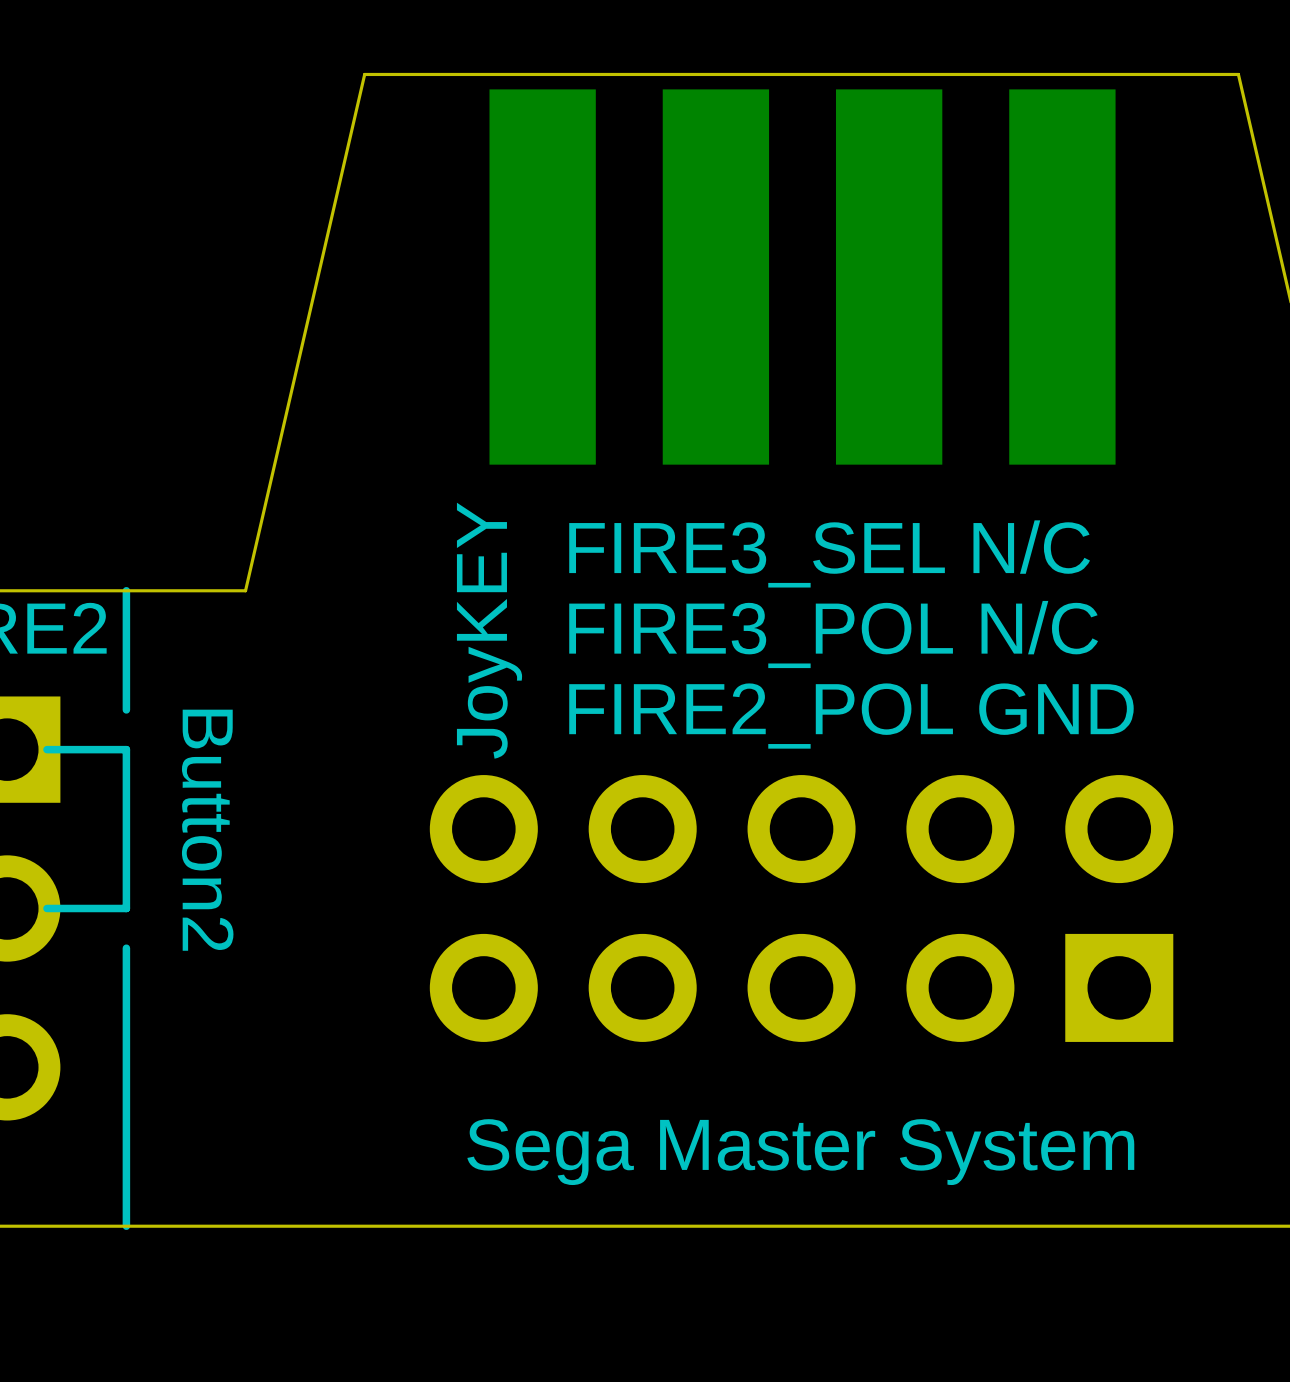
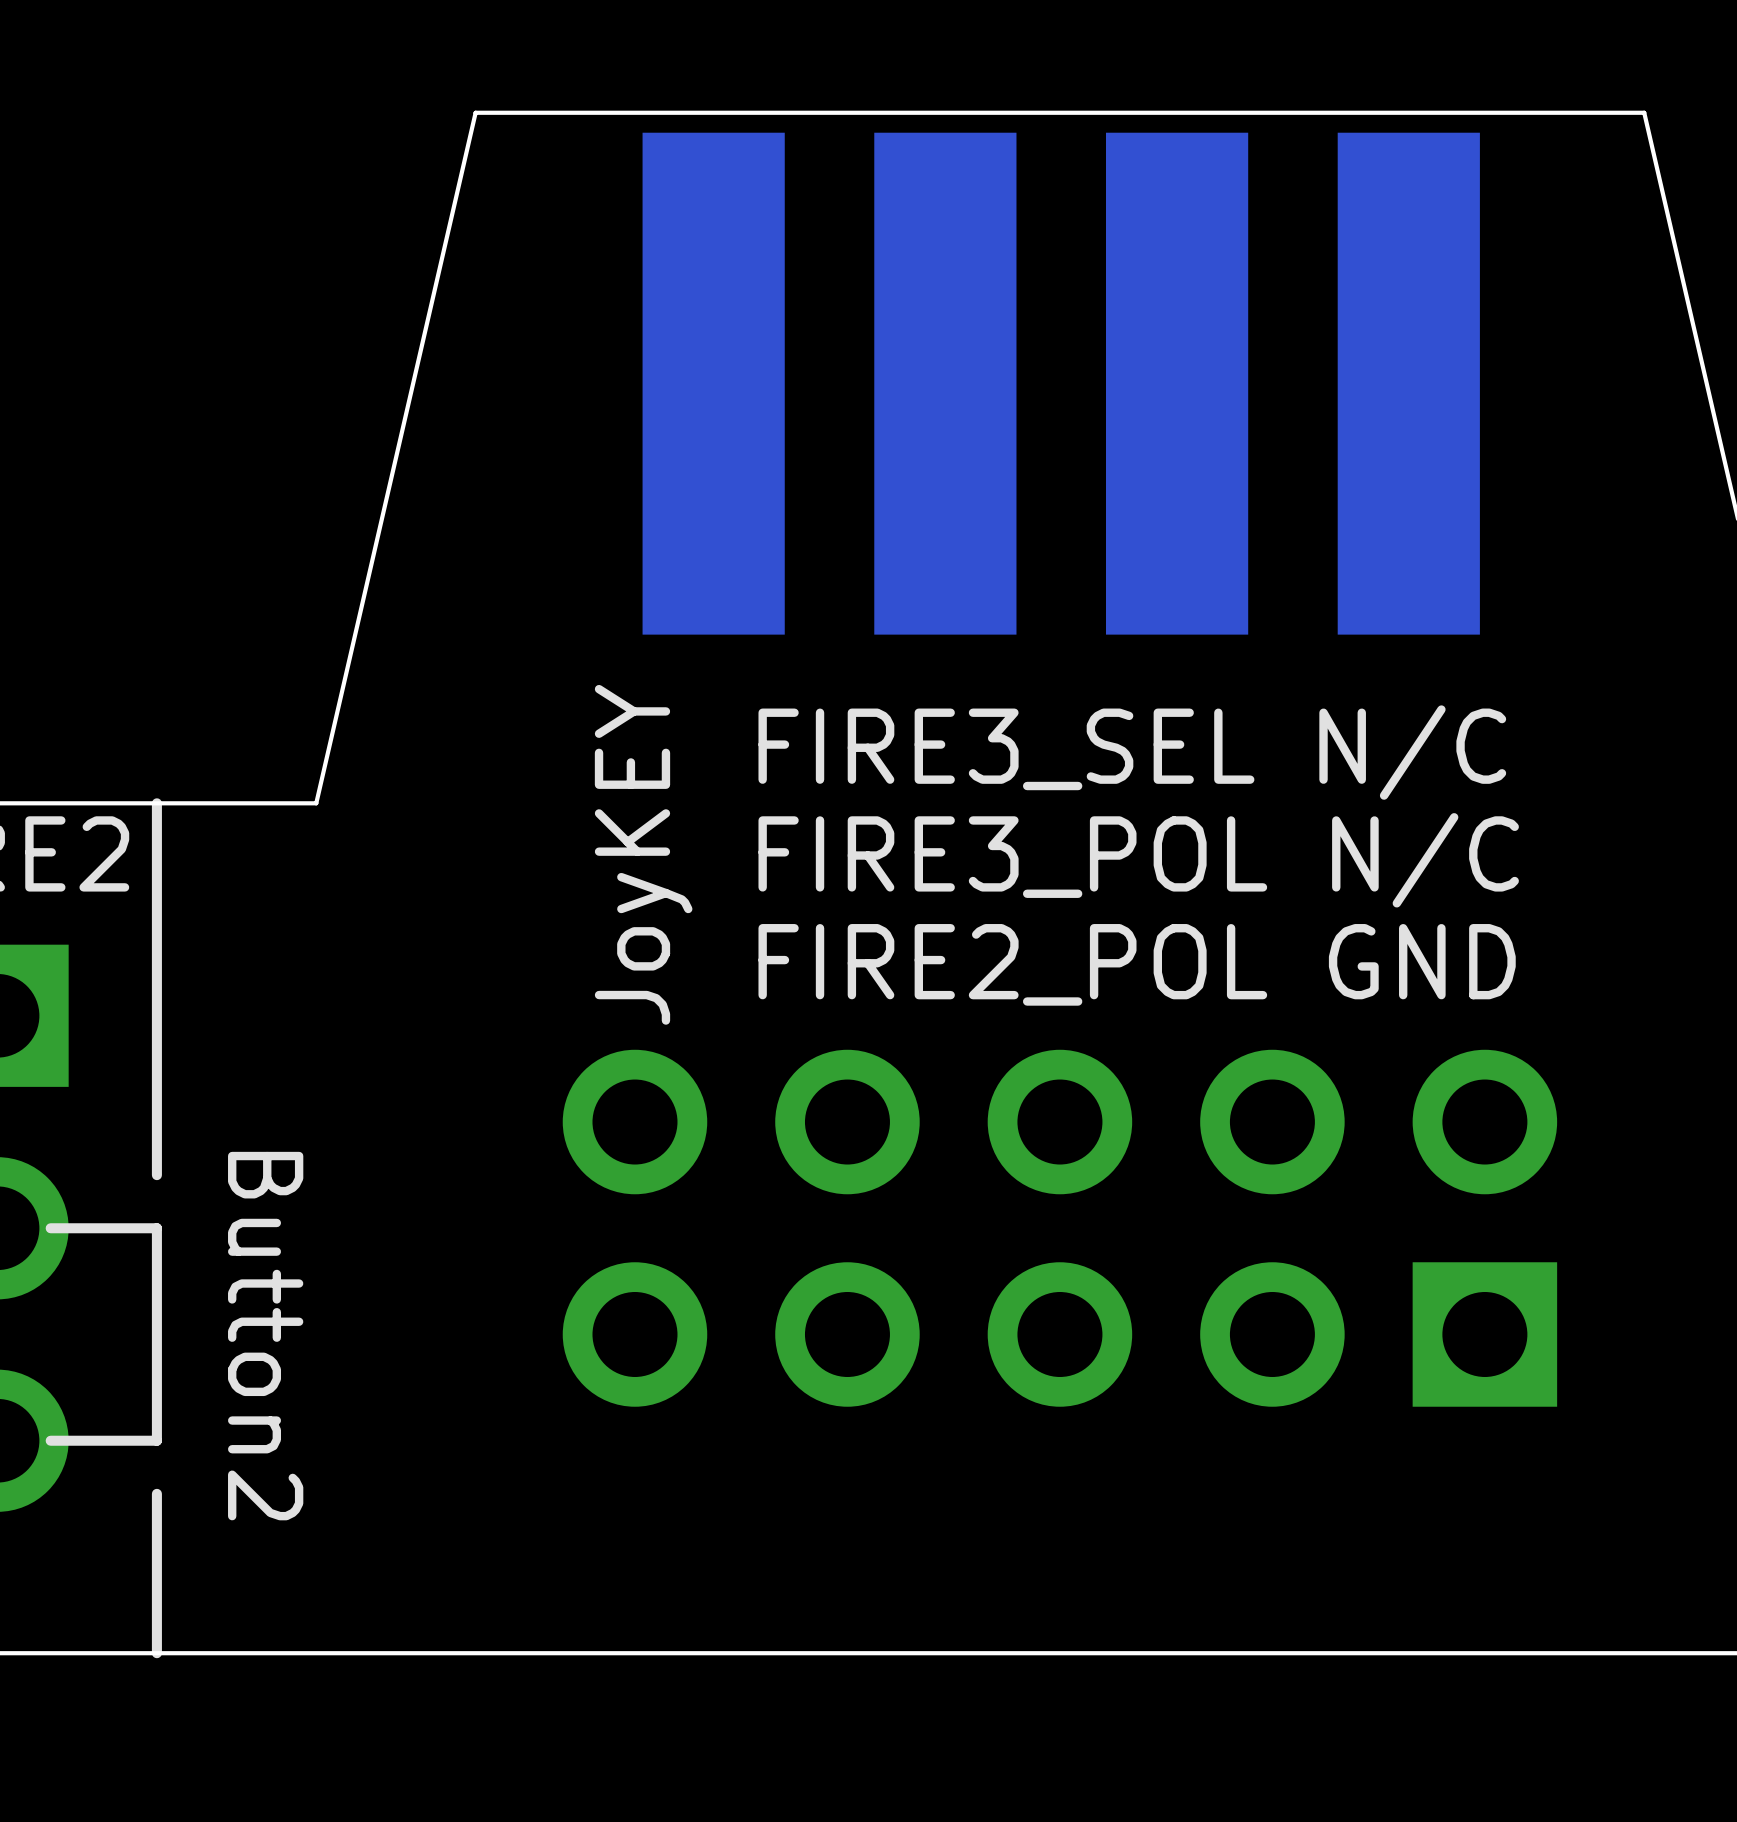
line: (126, 749) (46, 749) -> (156, 1015) (156, 962)
text position: Button2 (207, 830) -> Button2 (265, 1336)
line: (126, 868) (126, 908) -> (156, 1281) (156, 1228)
line: (126, 1067) (126, 1107) -> (156, 1440) (50, 1440)
text: Sega Master System (800, 1152) -> none

